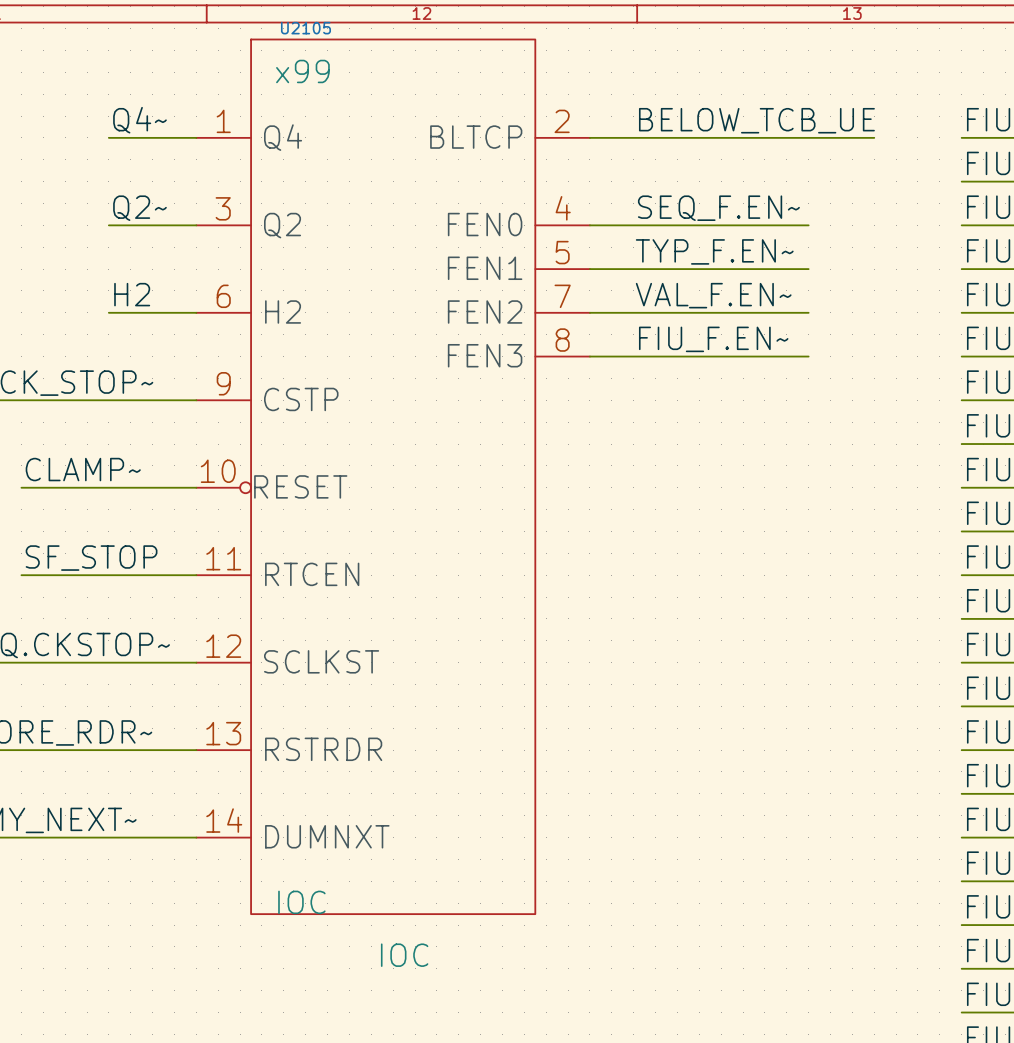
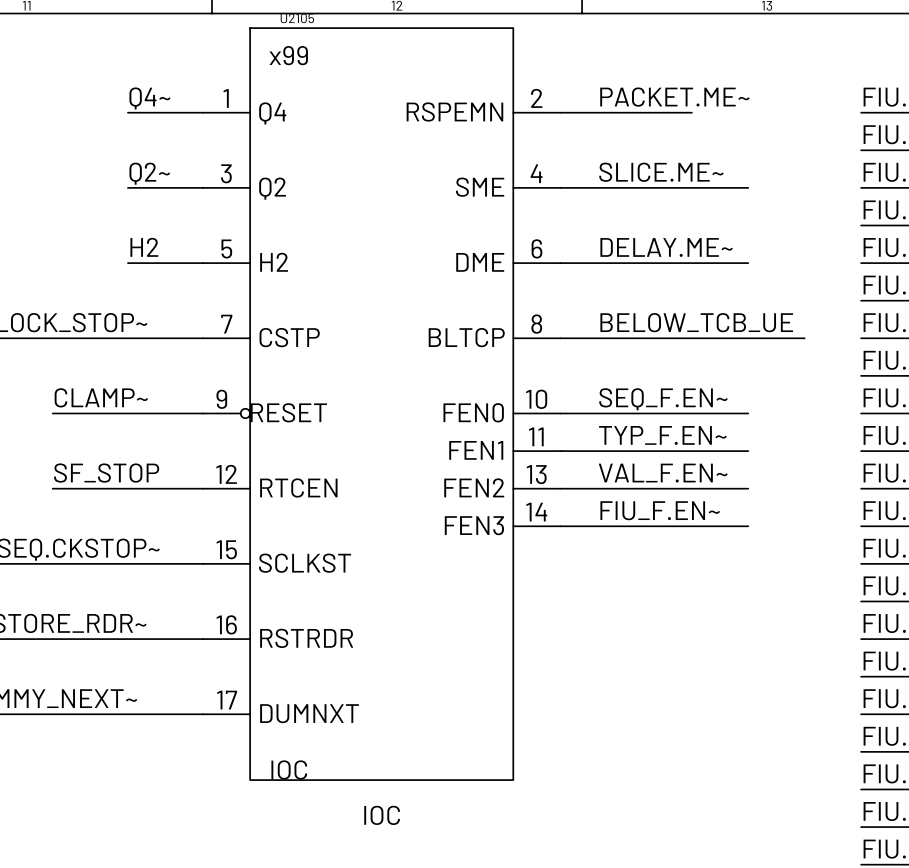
U2105 symbol: [196, 39, 590, 915] -> [203, 28, 561, 781]
label: none -> PACKET.ME~ (674, 97)
label: BELOW_TCB_UE (756, 120) -> none
wire: (764, 137) (874, 137) -> none
label: none -> SLICE.ME~ (661, 172)
label: SEQ_F.EN~ (718, 208) -> none
wire: none -> (729, 187) (748, 187)
label: TYP_F.EN~ (714, 251) -> none
wire: (589, 269) (808, 269) -> none
label: none -> DELAY.ME~ (666, 247)
label: VAL_F.EN~ (713, 295) -> none
wire: none -> (729, 263) (748, 263)
label: FIU_F.EN~ (713, 339) -> none
wire: (589, 356) (808, 356) -> (560, 413) (748, 413)
label: none -> BELOW_TCB_UE (696, 322)
wire: none -> (560, 338) (804, 338)
label: none -> SEQ_F.EN~ (663, 399)
label: none -> TYP_F.EN~ (662, 435)
wire: none -> (560, 451) (748, 451)
label: none -> VAL_F.EN~ (663, 473)
wire: none -> (560, 488) (748, 488)
label: none -> FIU_F.EN~ (660, 510)
wire: none -> (560, 526) (748, 526)

